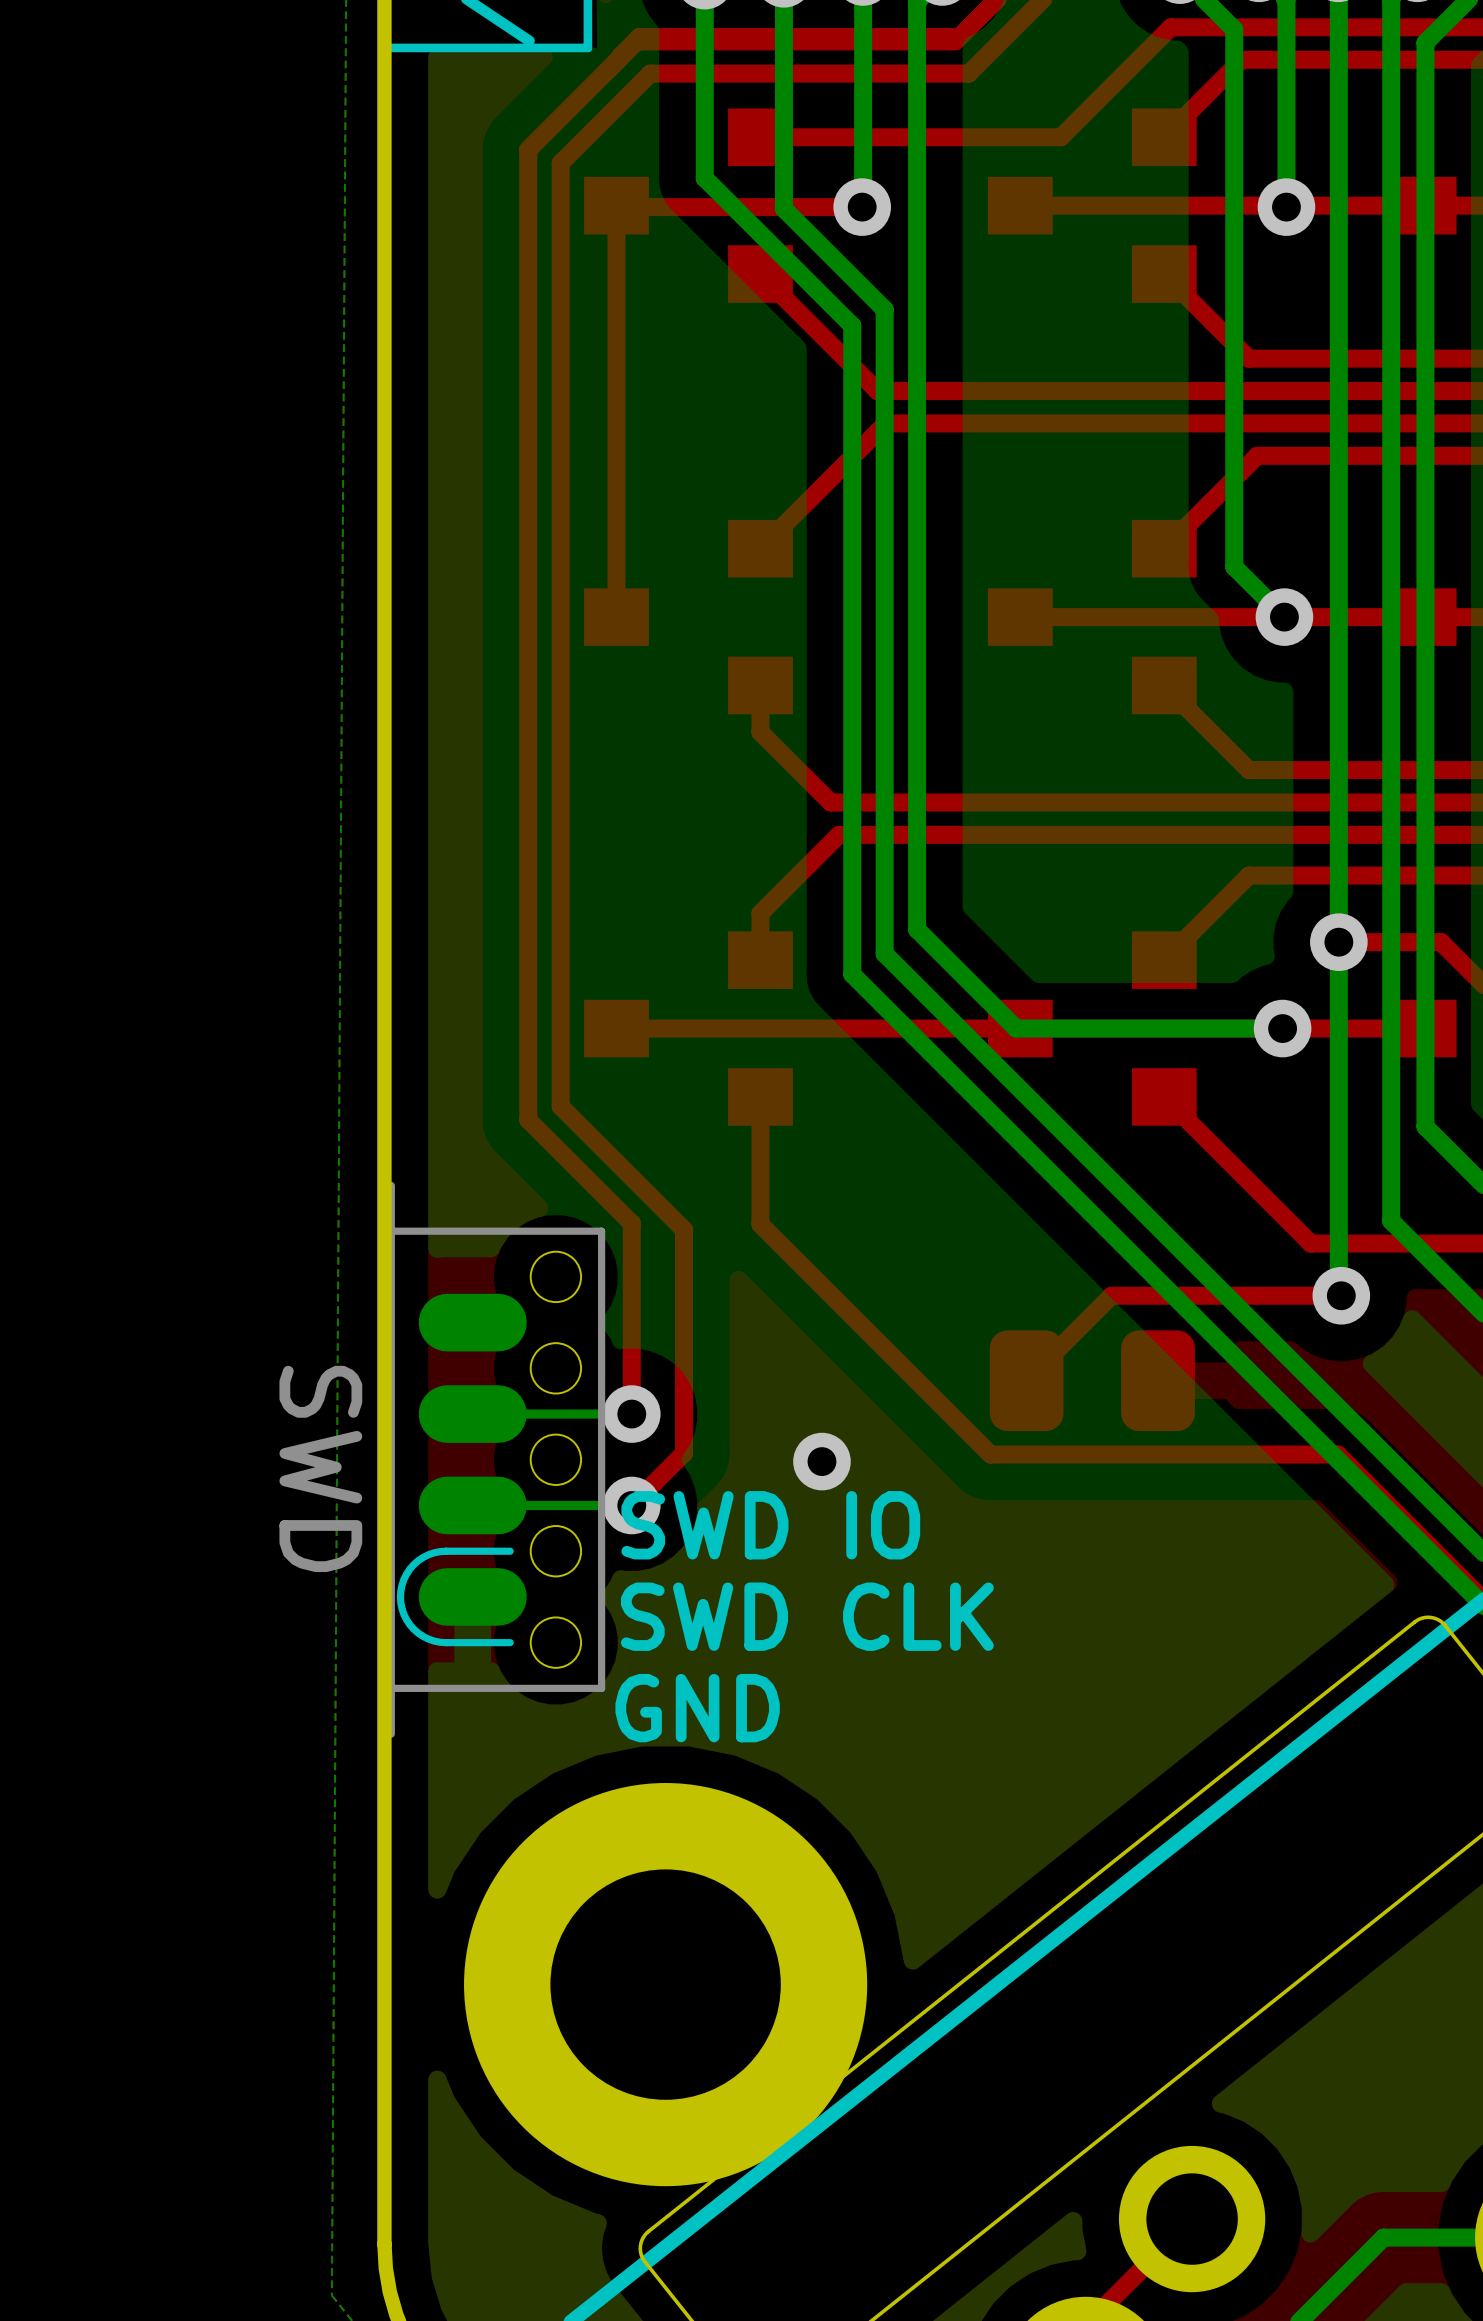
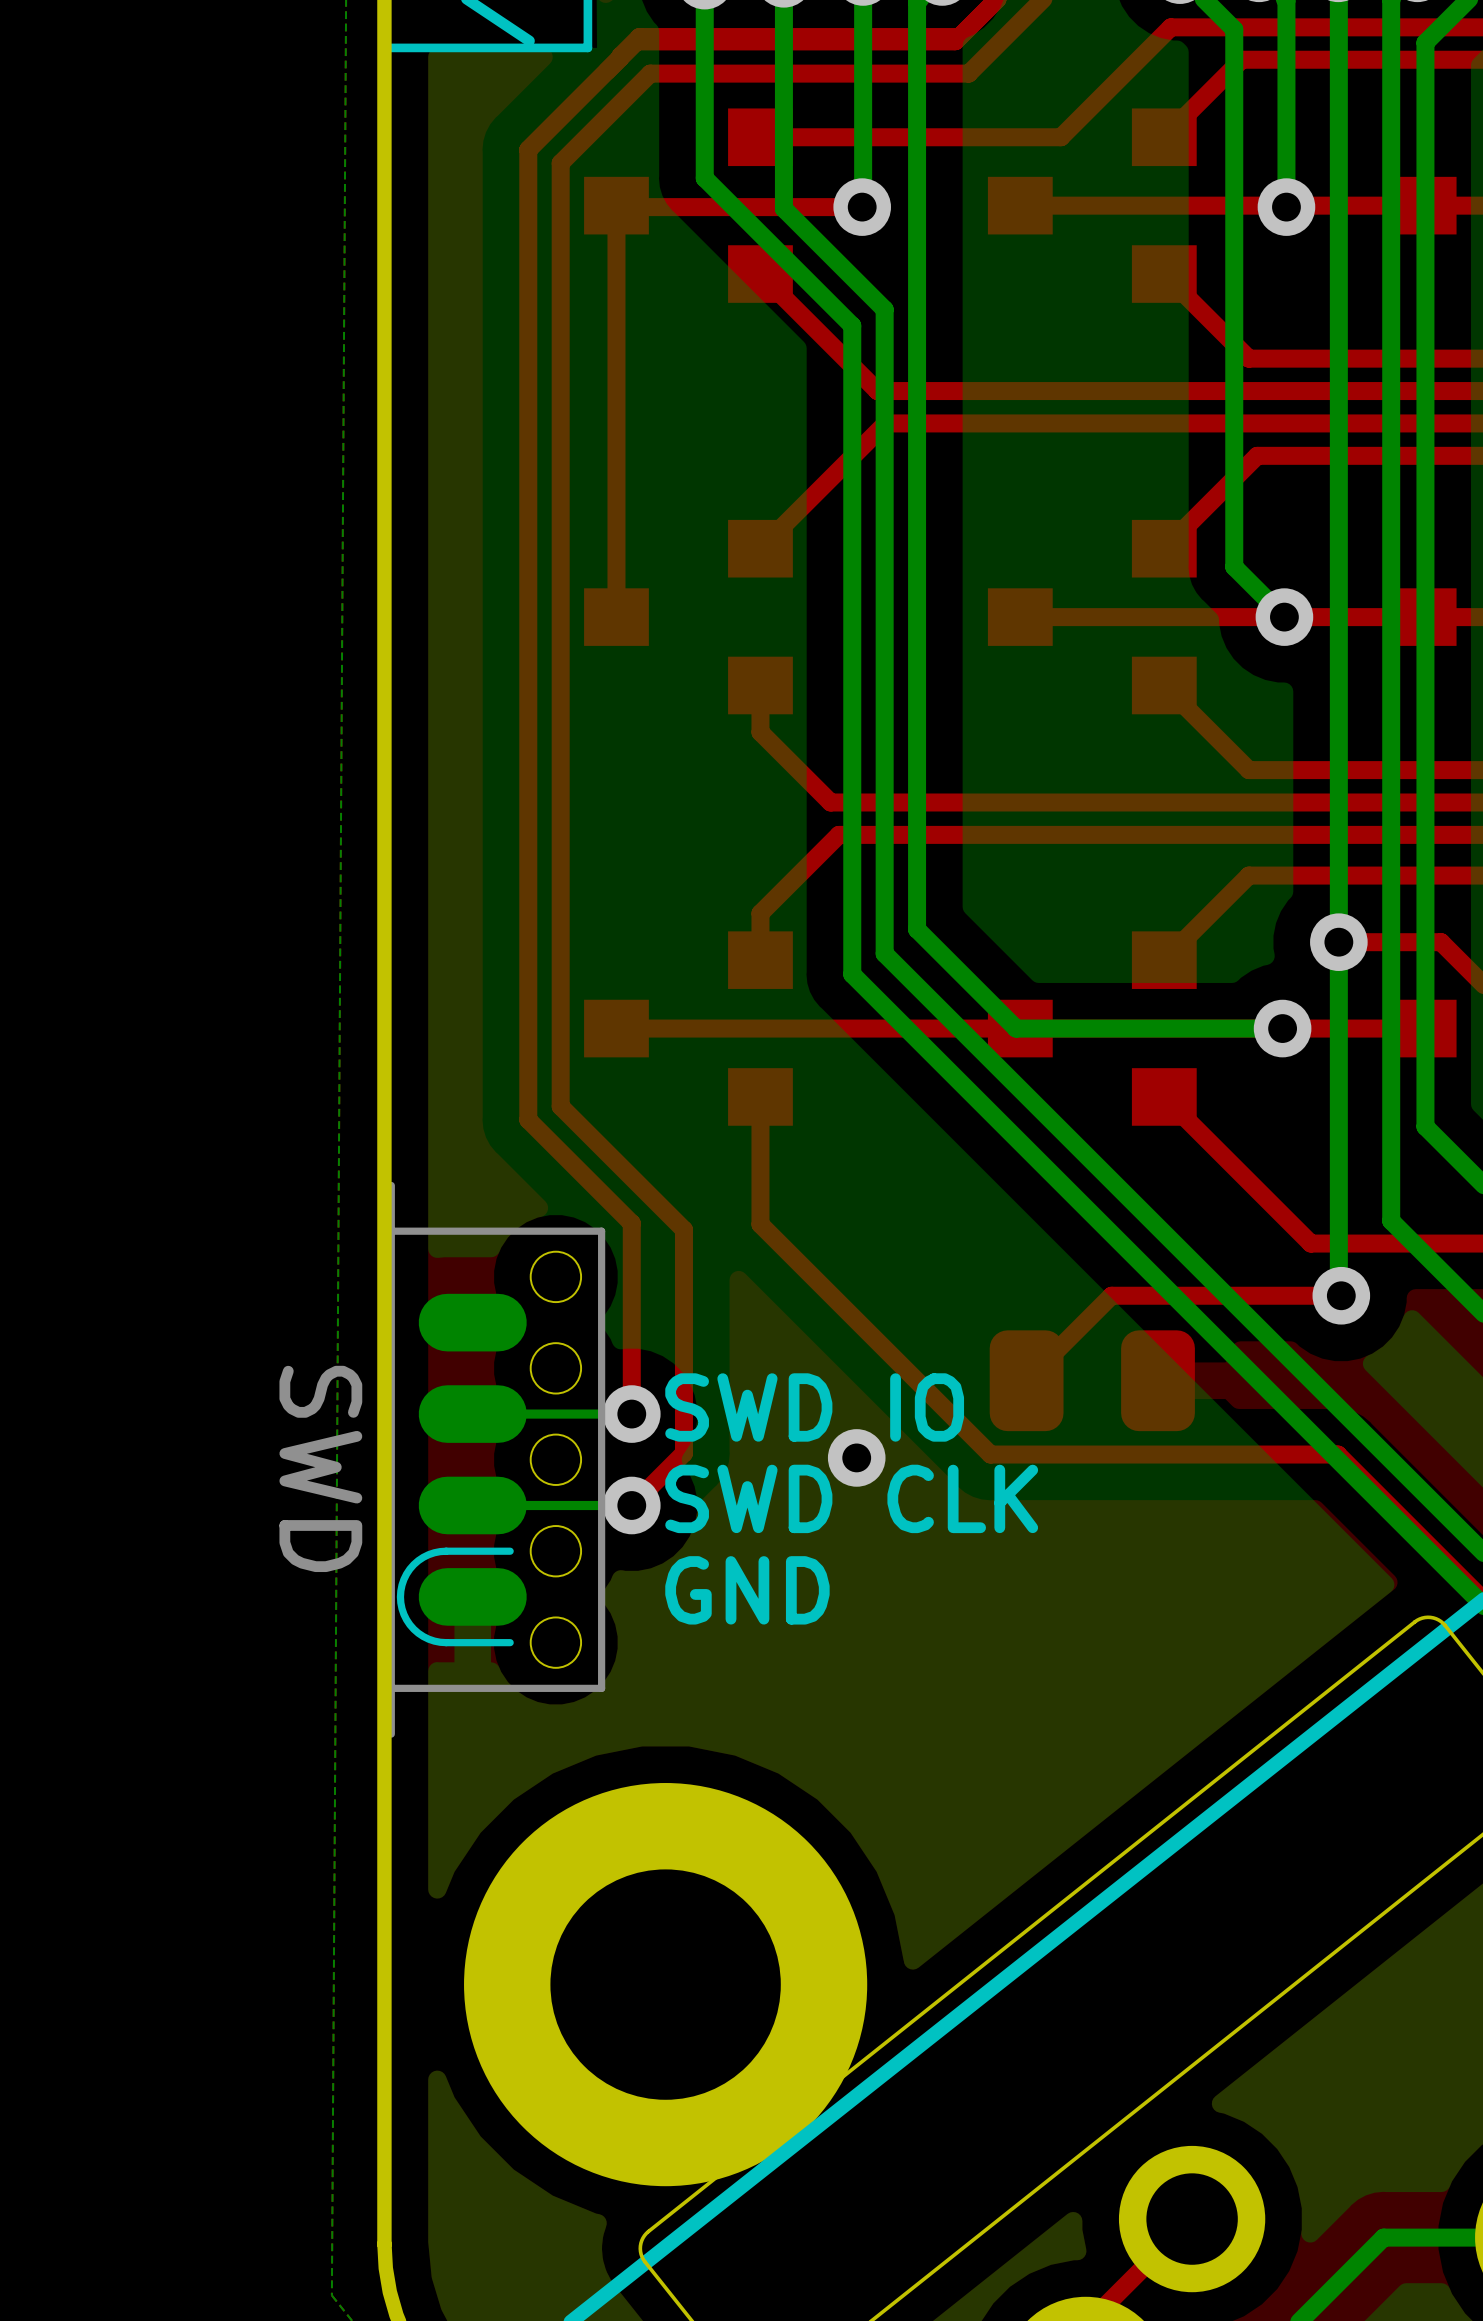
via position: (821, 1461) -> (856, 1457)
text position: SWD IO (770, 1525) -> SWD IO (814, 1407)
text position: SWD CLK (807, 1616) -> SWD CLK (851, 1498)
text position: GND (697, 1708) -> GND (747, 1590)

